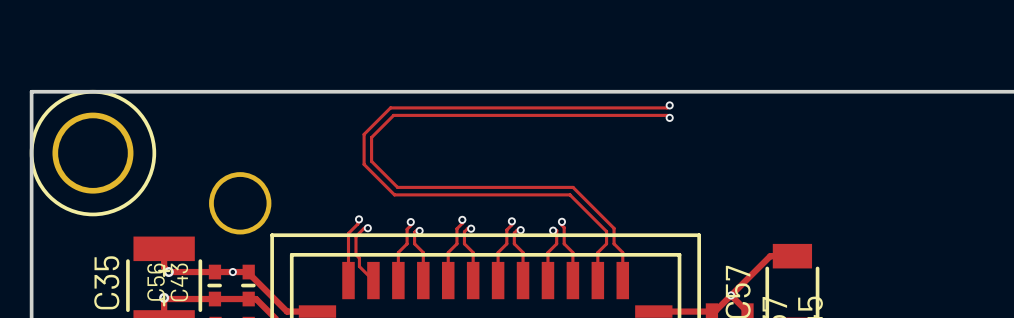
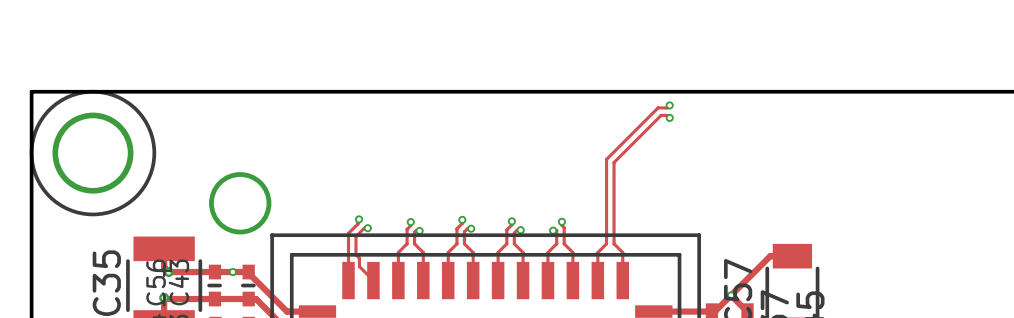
track: (658, 107) (390, 107) (364, 134) (364, 164) (394, 194) (569, 194) (606, 231) -> (658, 107) (606, 159) (606, 231)
track: (661, 115) (393, 115) (371, 137) (371, 161) (397, 187) (573, 187) (614, 228) -> (661, 115) (614, 162) (614, 228)

